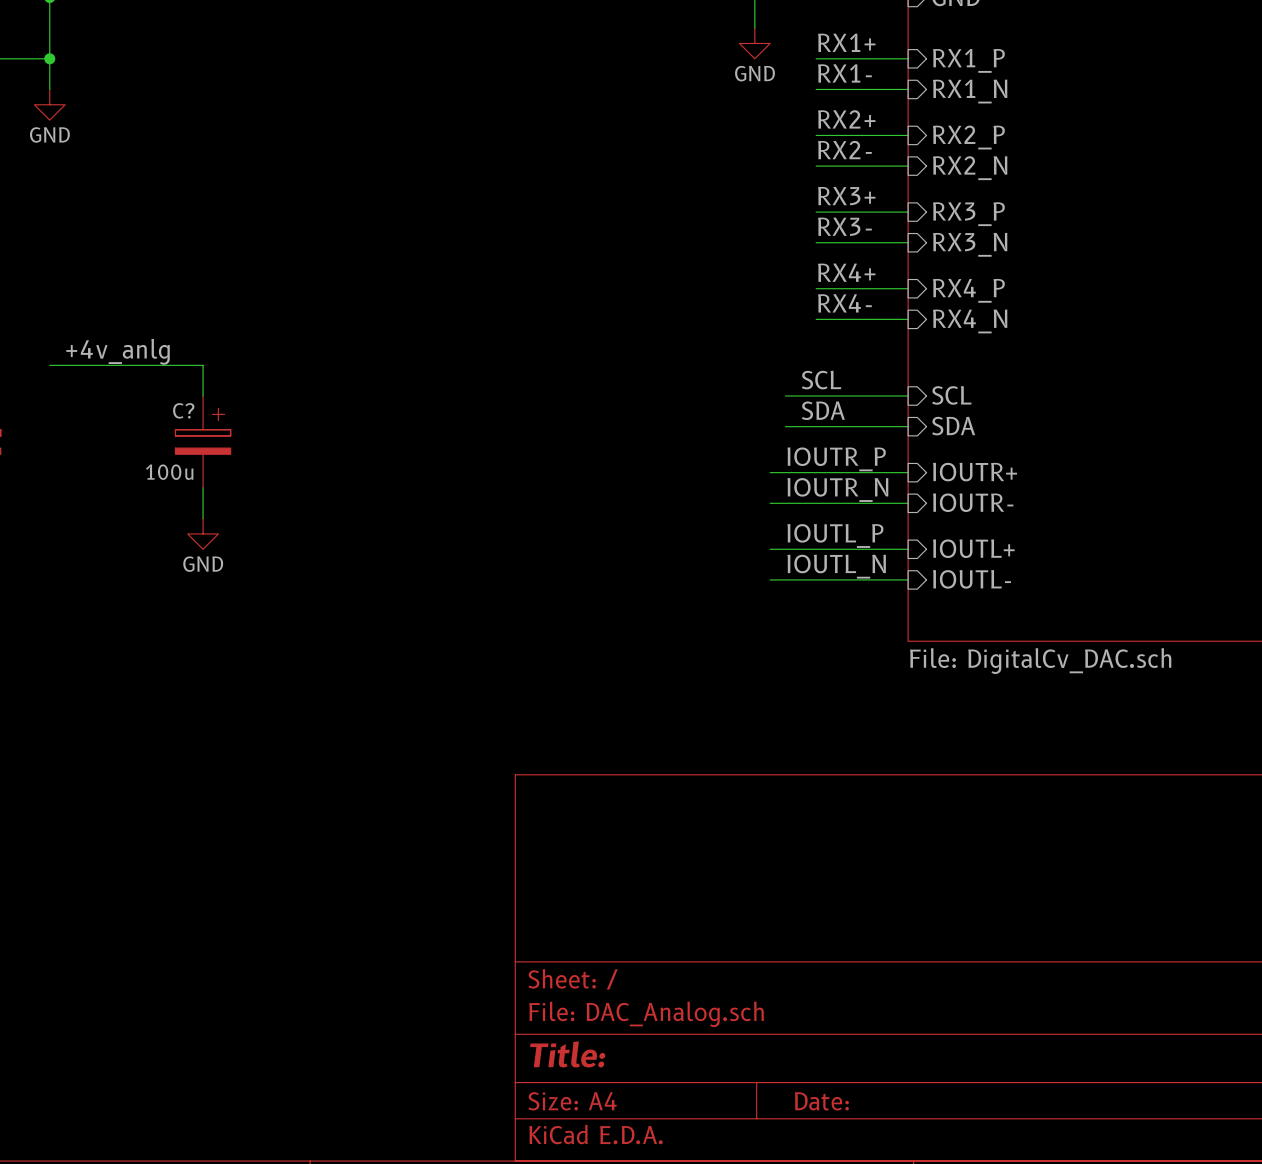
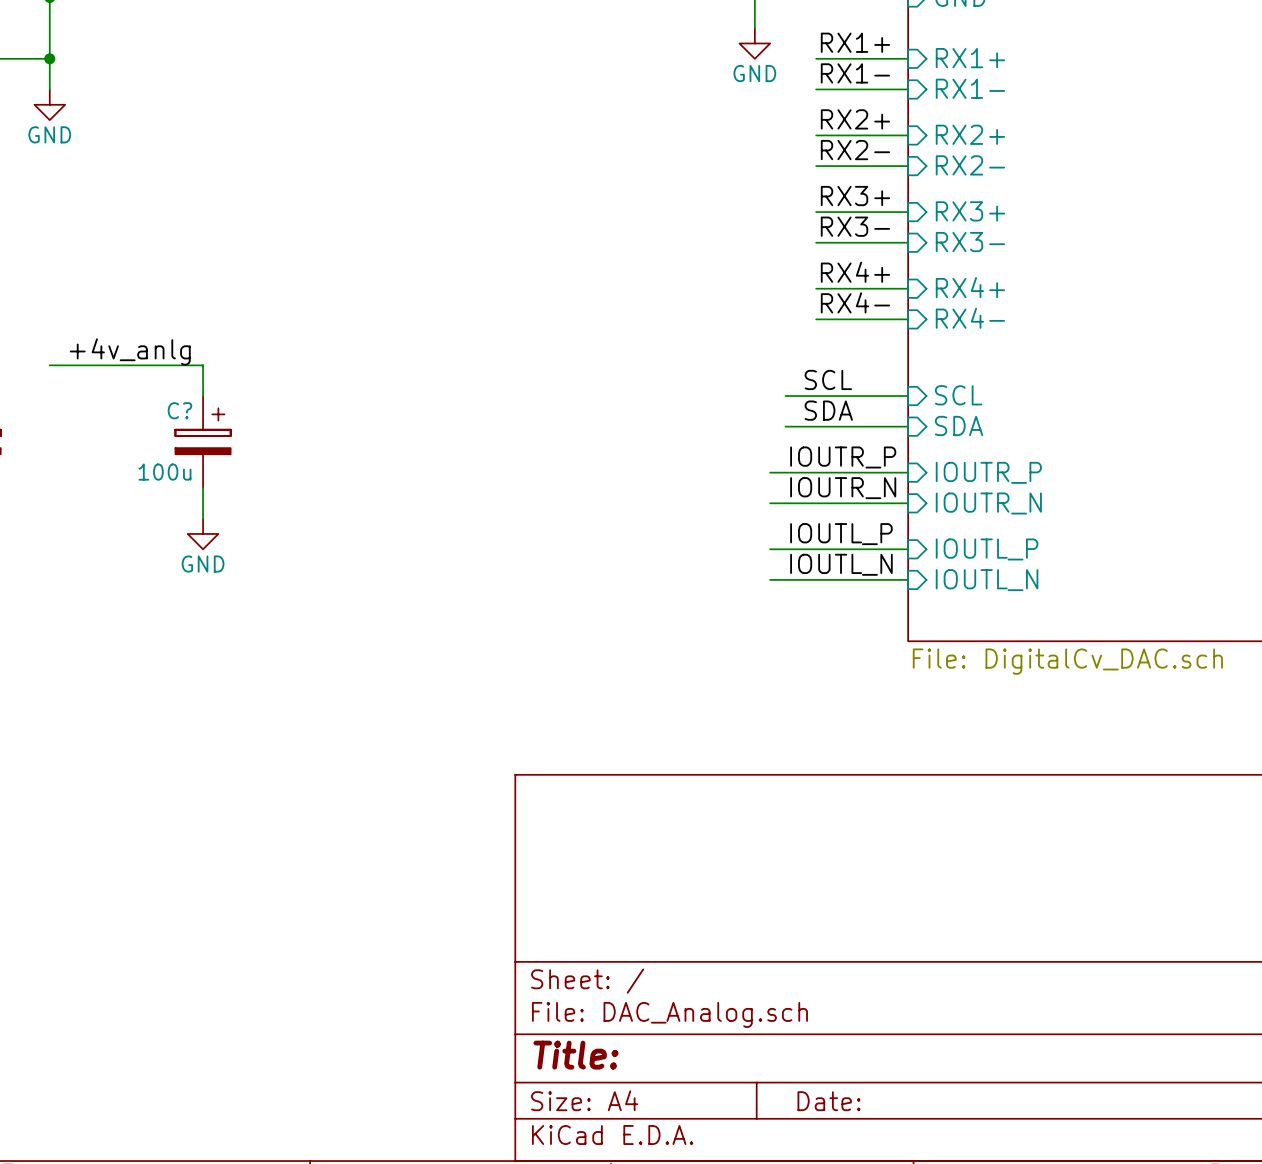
sheet pin: RX1_P (968, 60) -> RX1+ (970, 58)
sheet pin: RX1_N (970, 91) -> RX1- (970, 88)
sheet pin: RX2_P (968, 137) -> RX2+ (970, 134)
sheet pin: RX2_N (970, 168) -> RX2- (970, 165)
sheet pin: RX3_P (968, 214) -> RX3+ (970, 211)
sheet pin: RX3_N (970, 244) -> RX3- (970, 242)
sheet pin: RX4_P (968, 290) -> RX4+ (970, 287)
sheet pin: RX4_N (970, 321) -> RX4- (970, 318)
sheet pin: IOUTR+ (975, 472) -> IOUTR_P (988, 472)
sheet pin: IOUTR- (973, 502) -> IOUTR_N (988, 503)
sheet pin: IOUTL+ (973, 548) -> IOUTL_P (987, 549)
sheet pin: IOUTL- (972, 579) -> IOUTL_N (987, 580)

